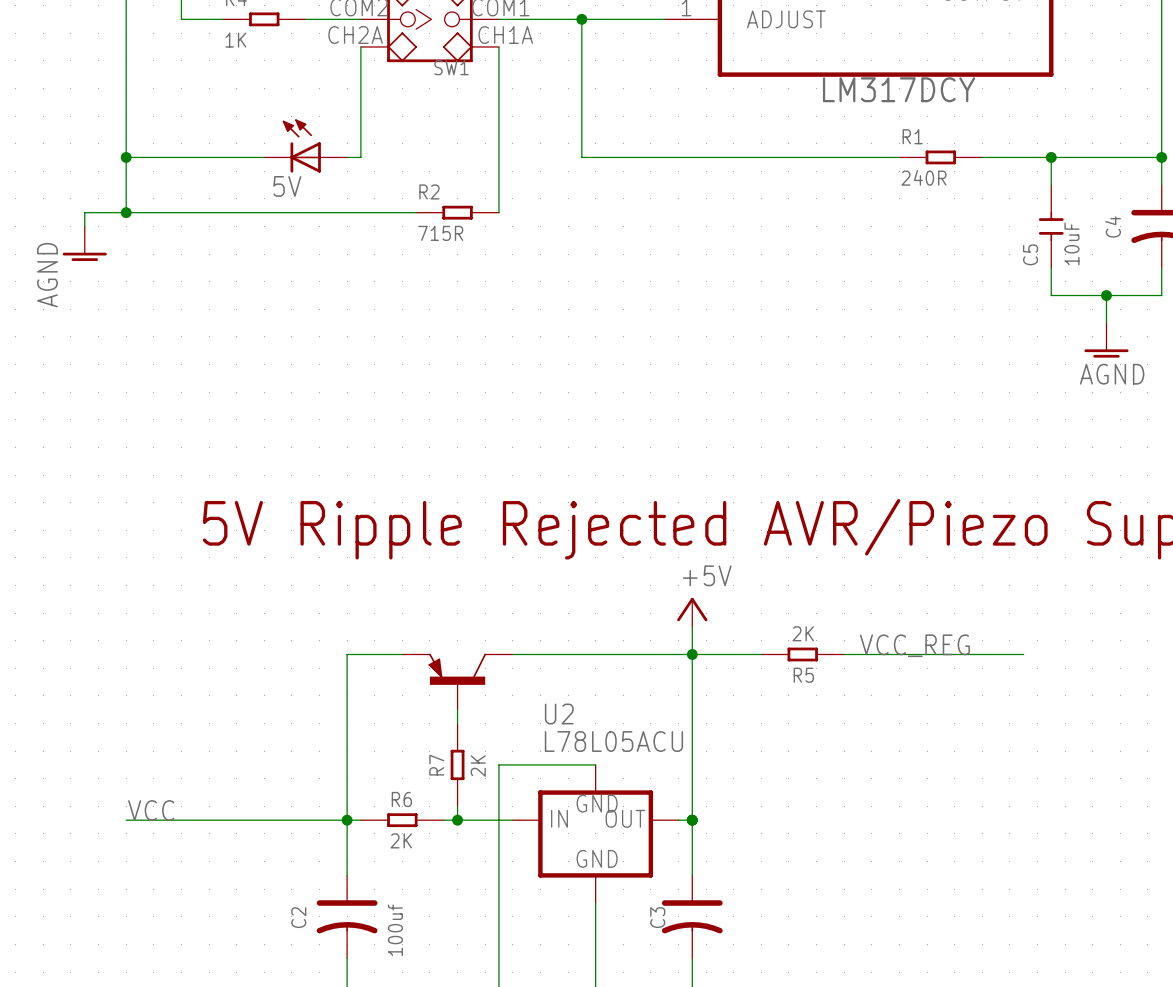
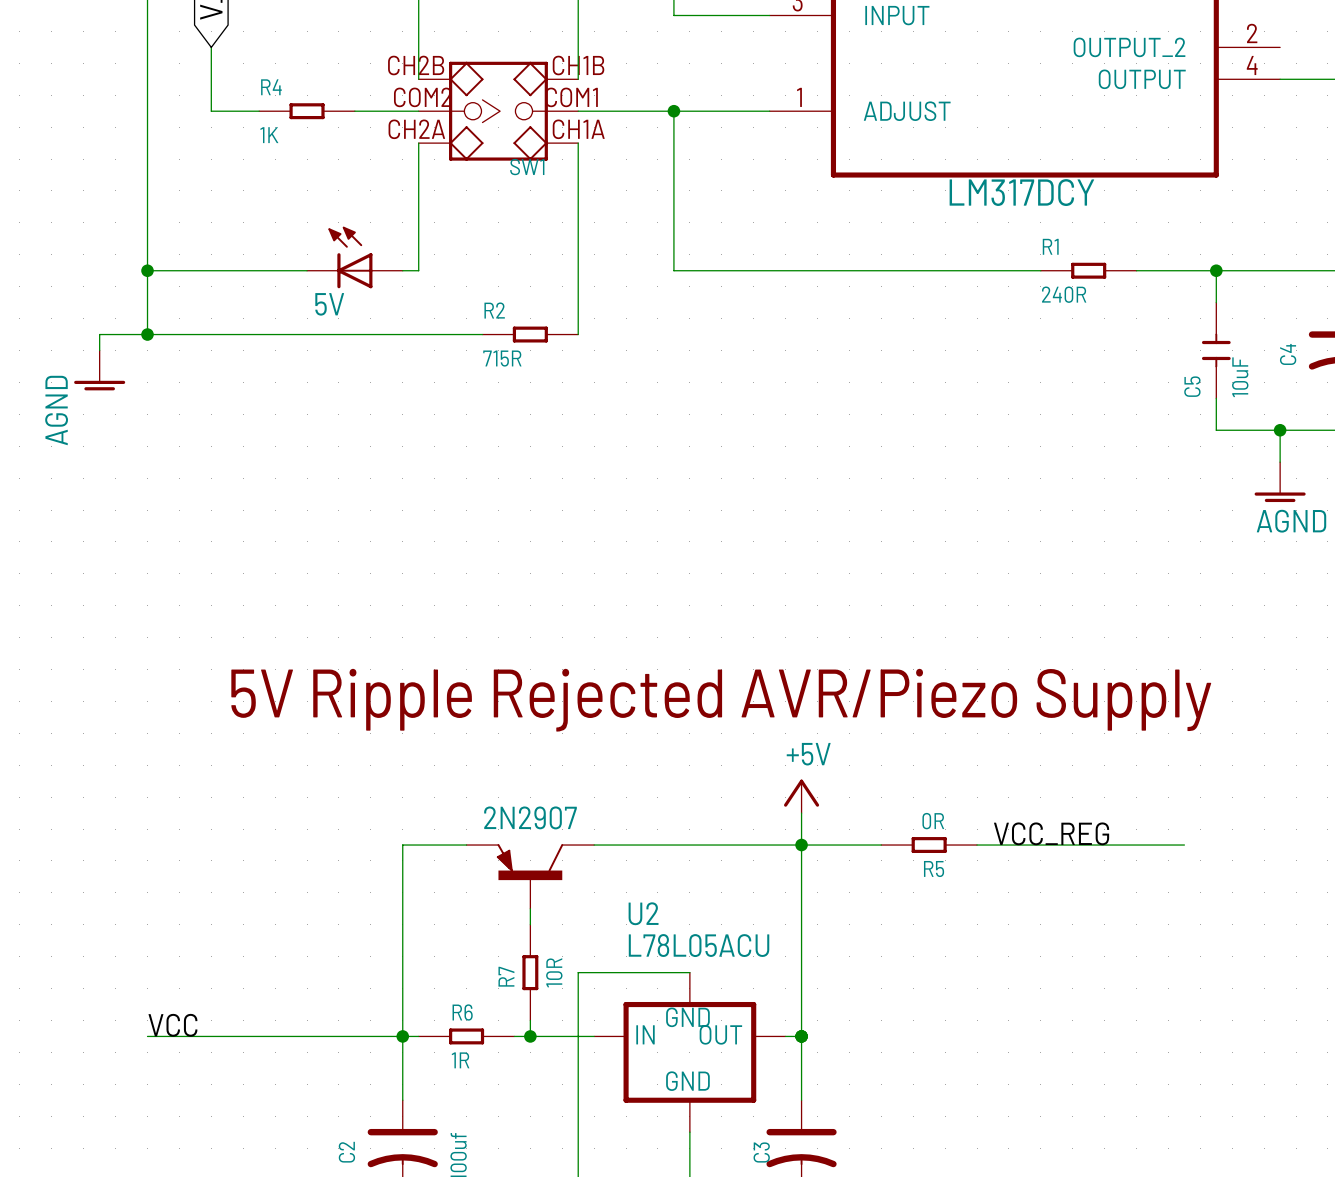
part value: none -> 2N2907 (530, 817)
R5 value: 2K (803, 633) -> 0R (933, 821)
R7 value: 2K (478, 766) -> 10R (554, 972)
R6 value: 2K (401, 840) -> 1R (460, 1060)

